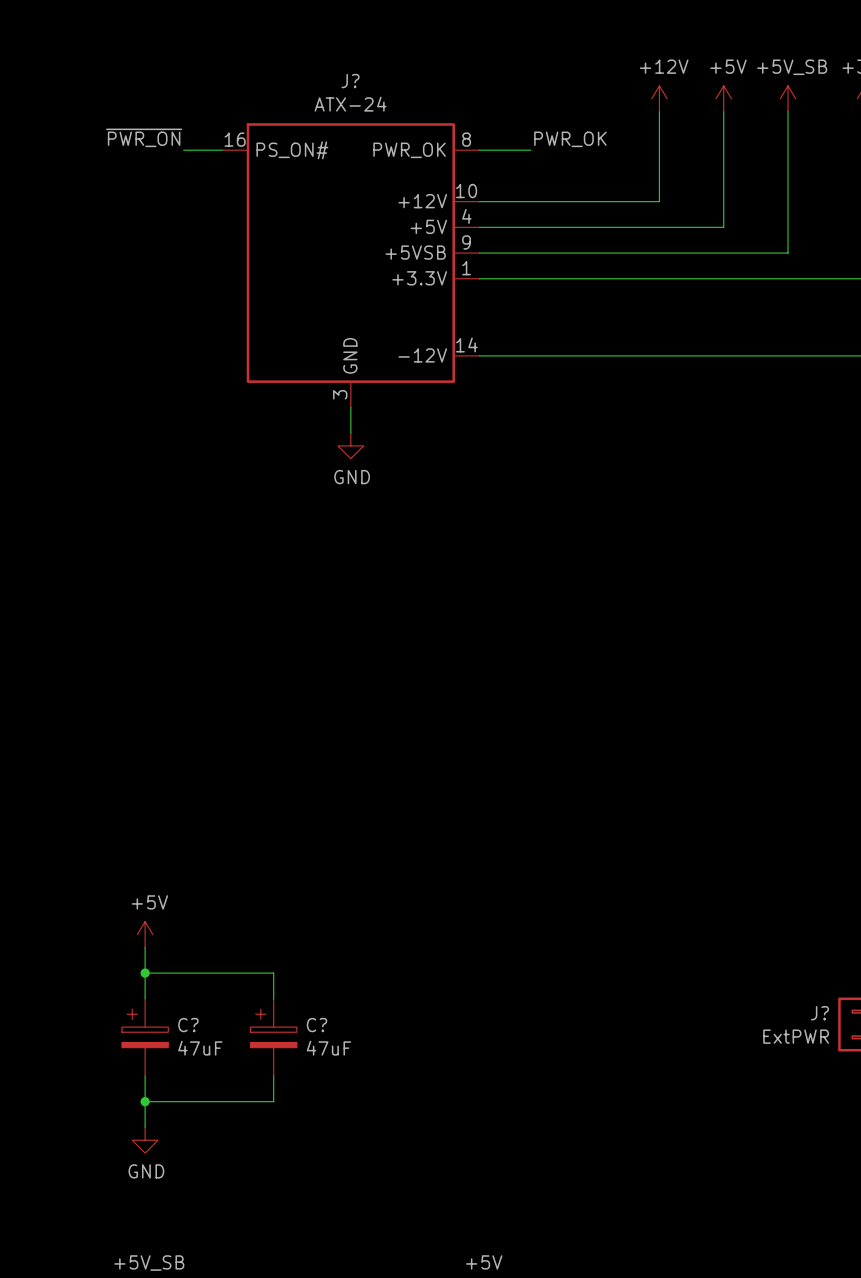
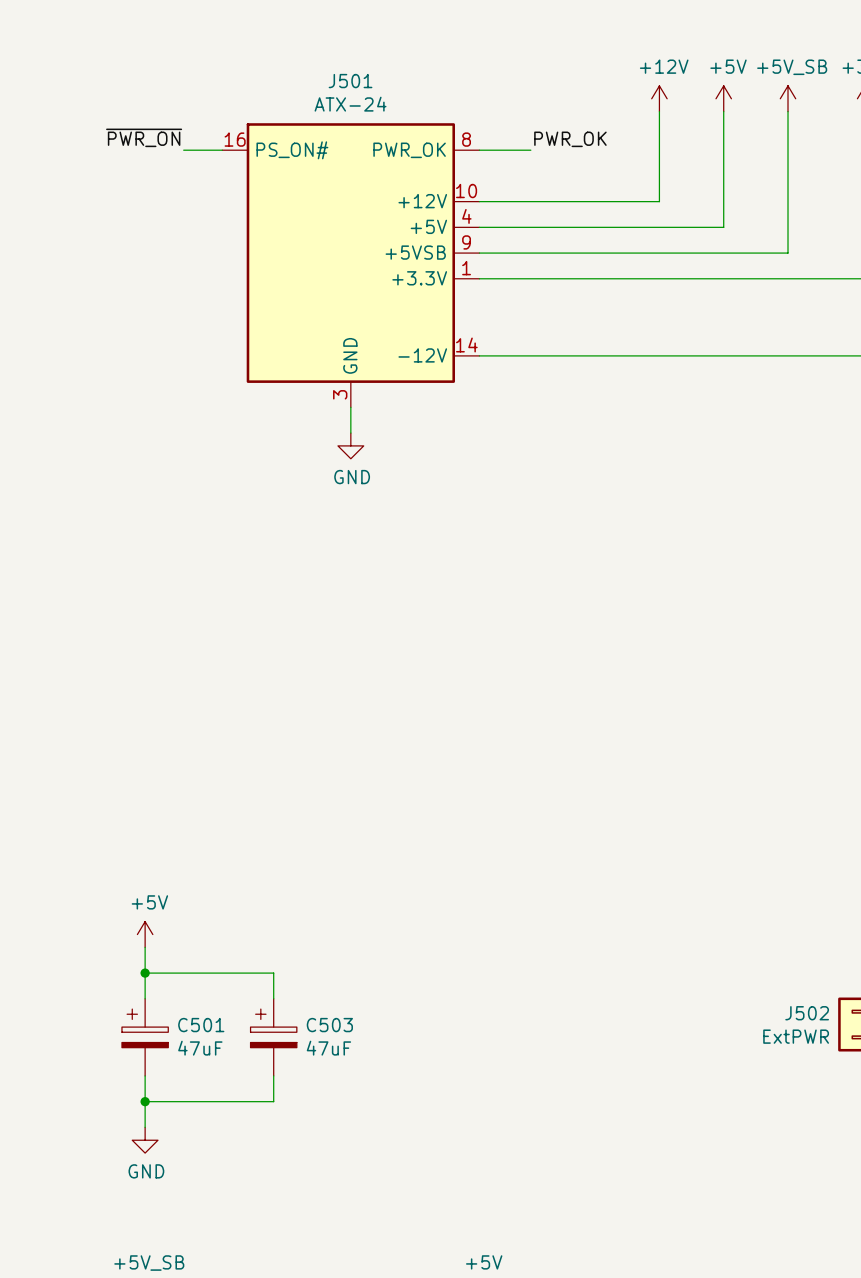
J? name: J? (350, 81) -> J501 (350, 81)
J? name: J? (819, 1013) -> J502 (807, 1013)
C? name: C? (188, 1025) -> C501 (201, 1025)
C? name: C? (316, 1025) -> C503 (329, 1025)

